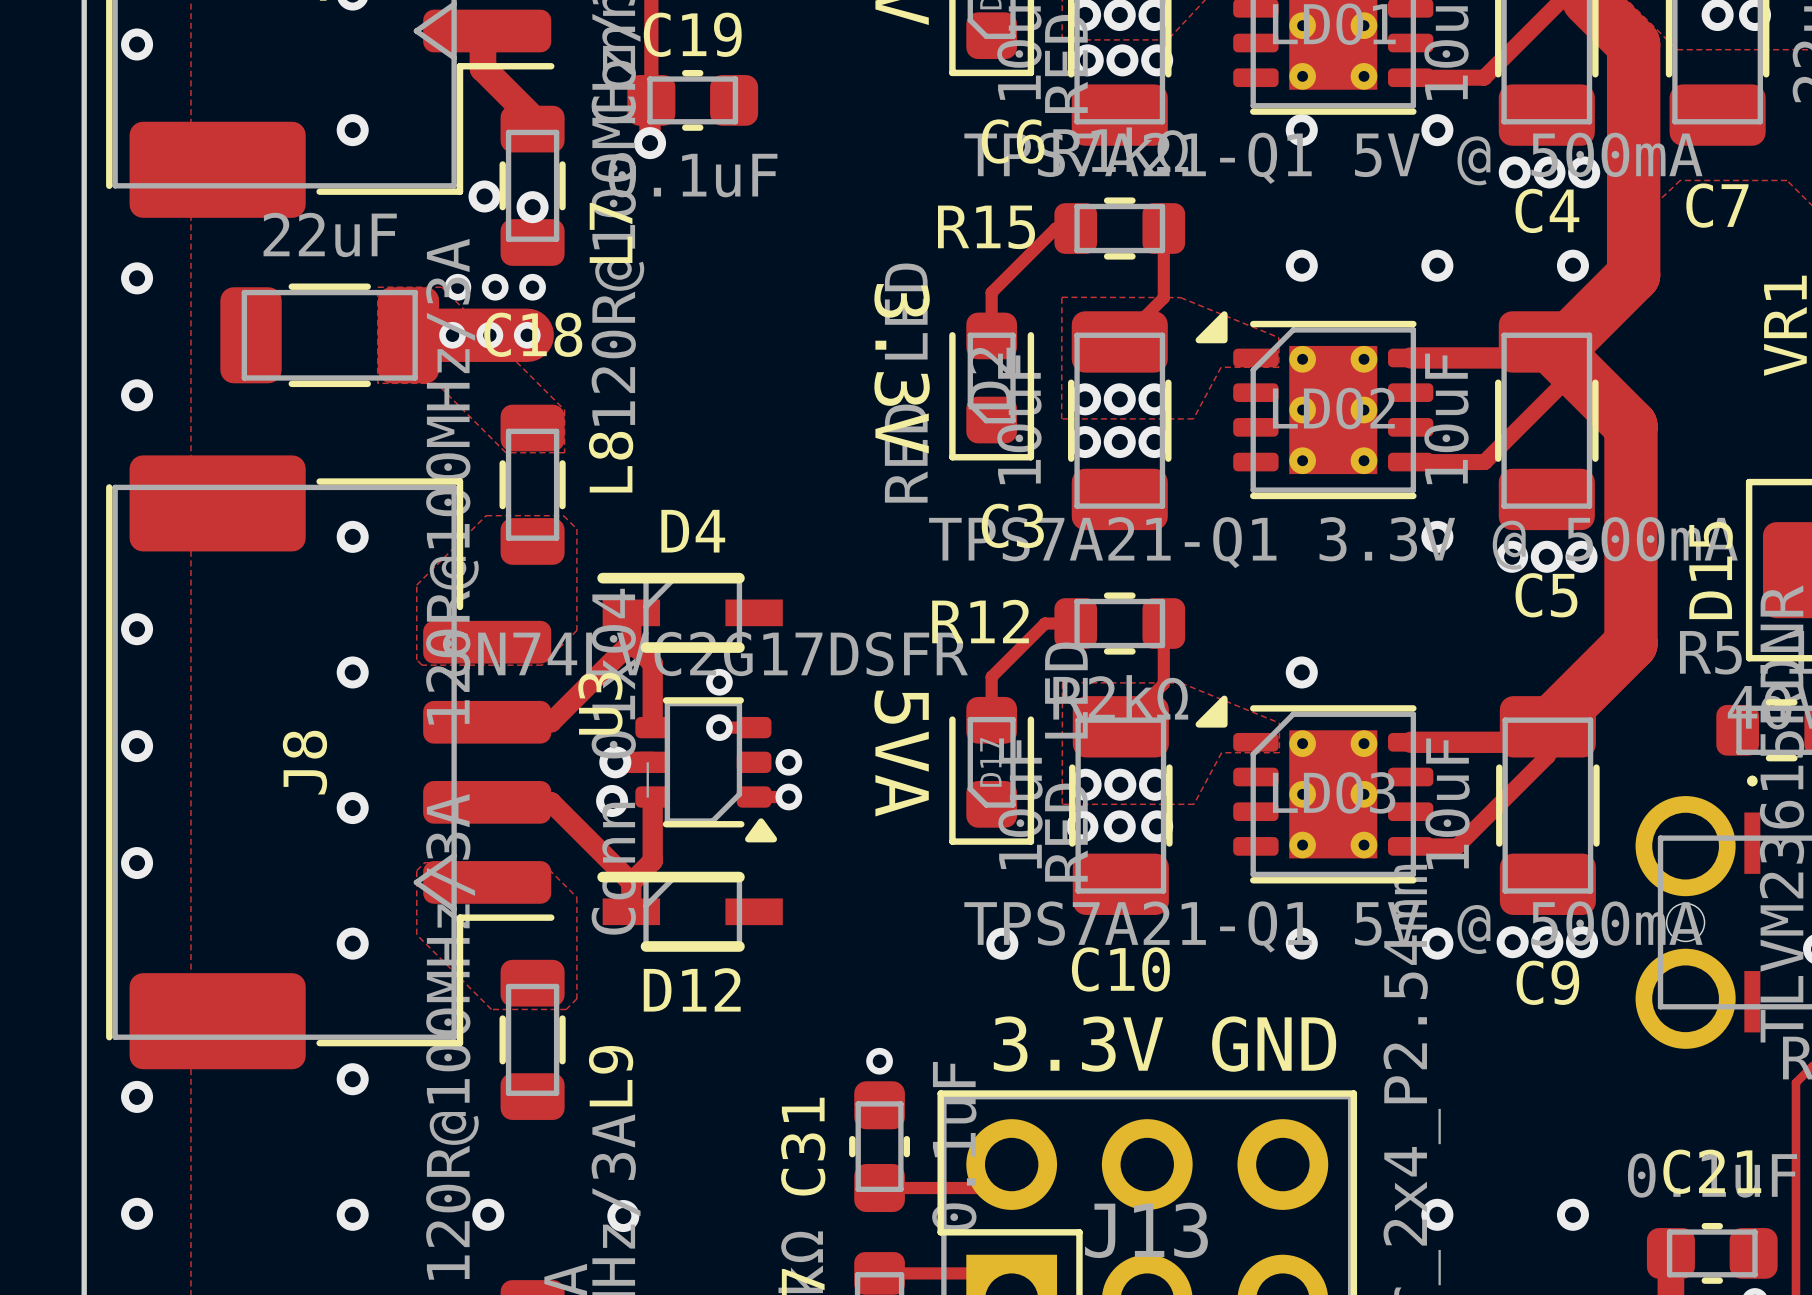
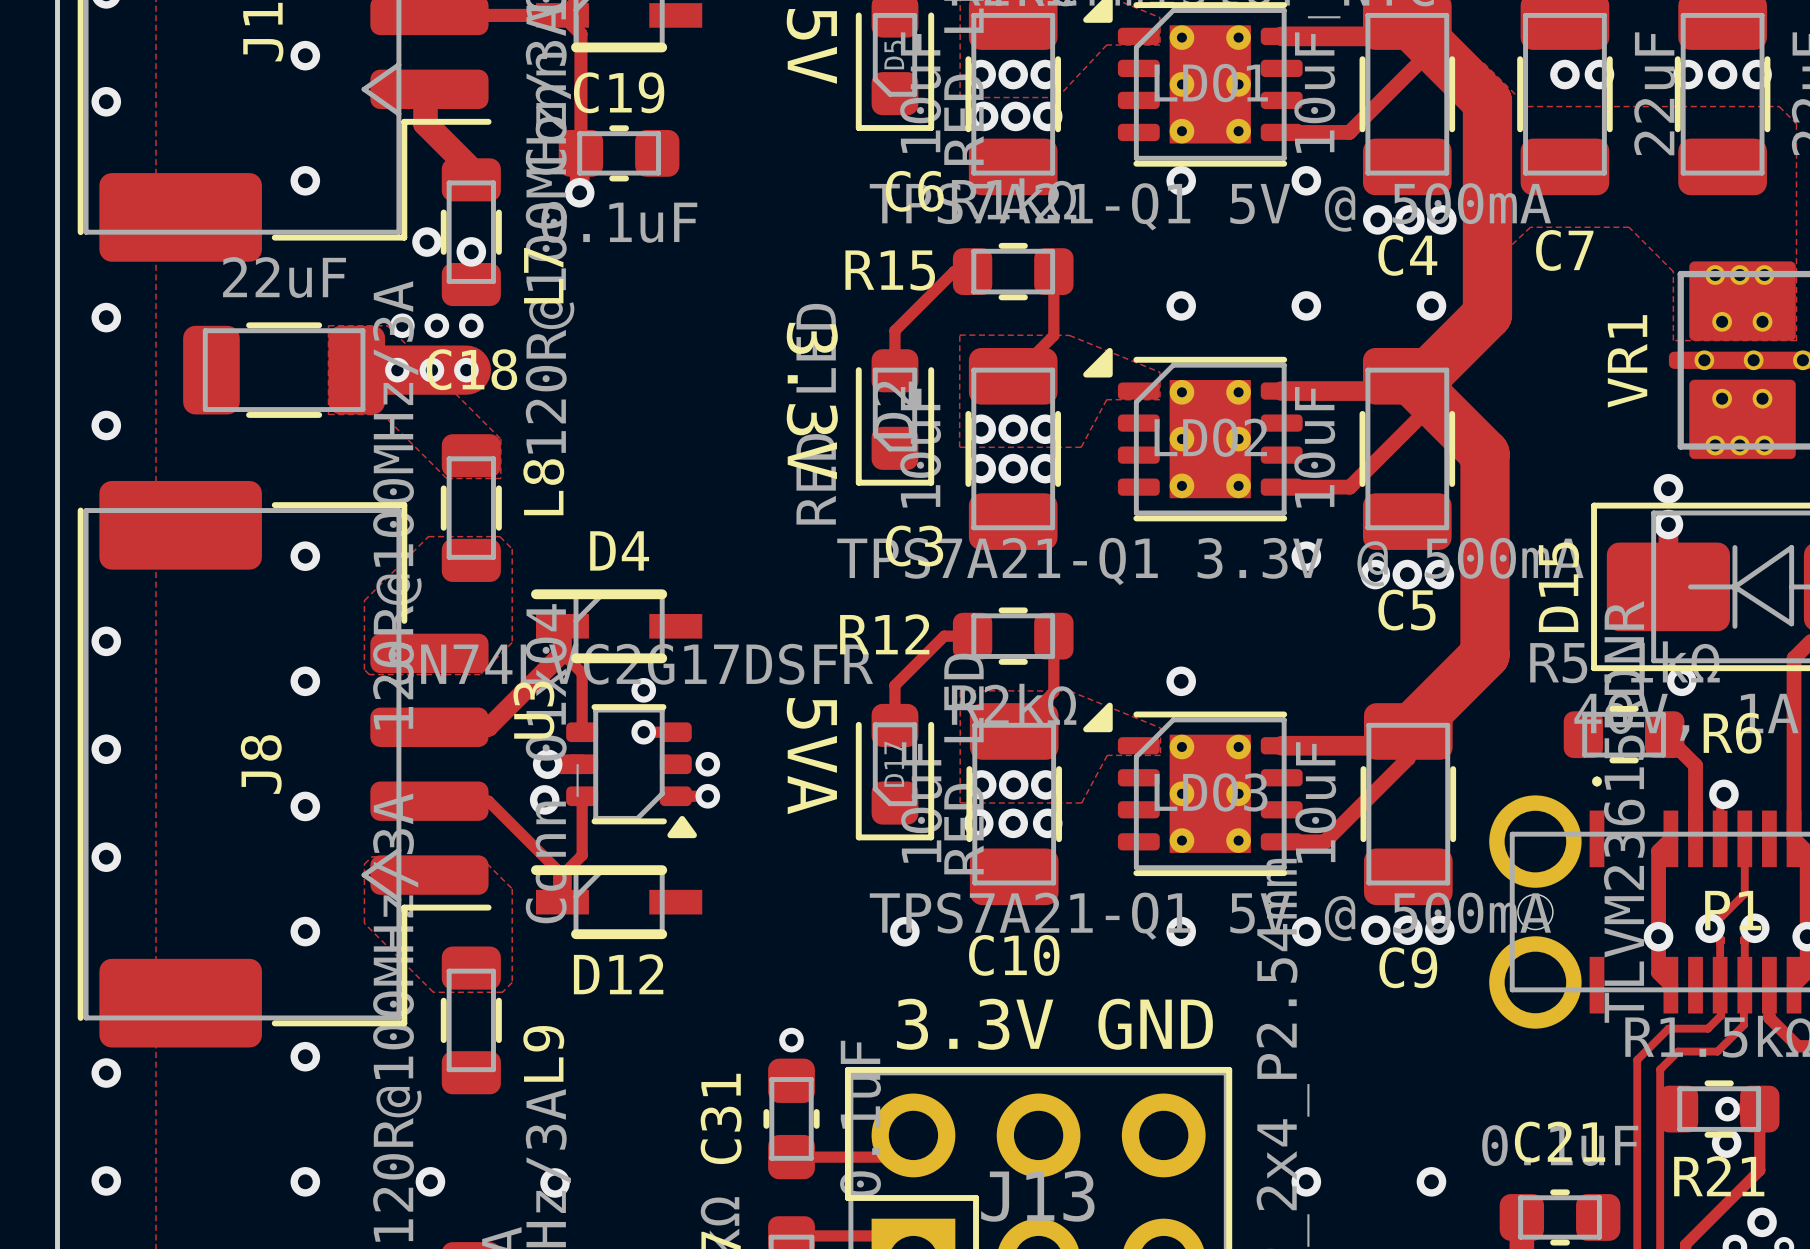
track width: thick (631, 642) (652, 663) (652, 727) -> thin (562, 653) (582, 673) (582, 732)
track width: thick (652, 797) (652, 861) (631, 882) (551, 802) (487, 802) -> thin (582, 796) (582, 855) (562, 875) (488, 801) (429, 801)

